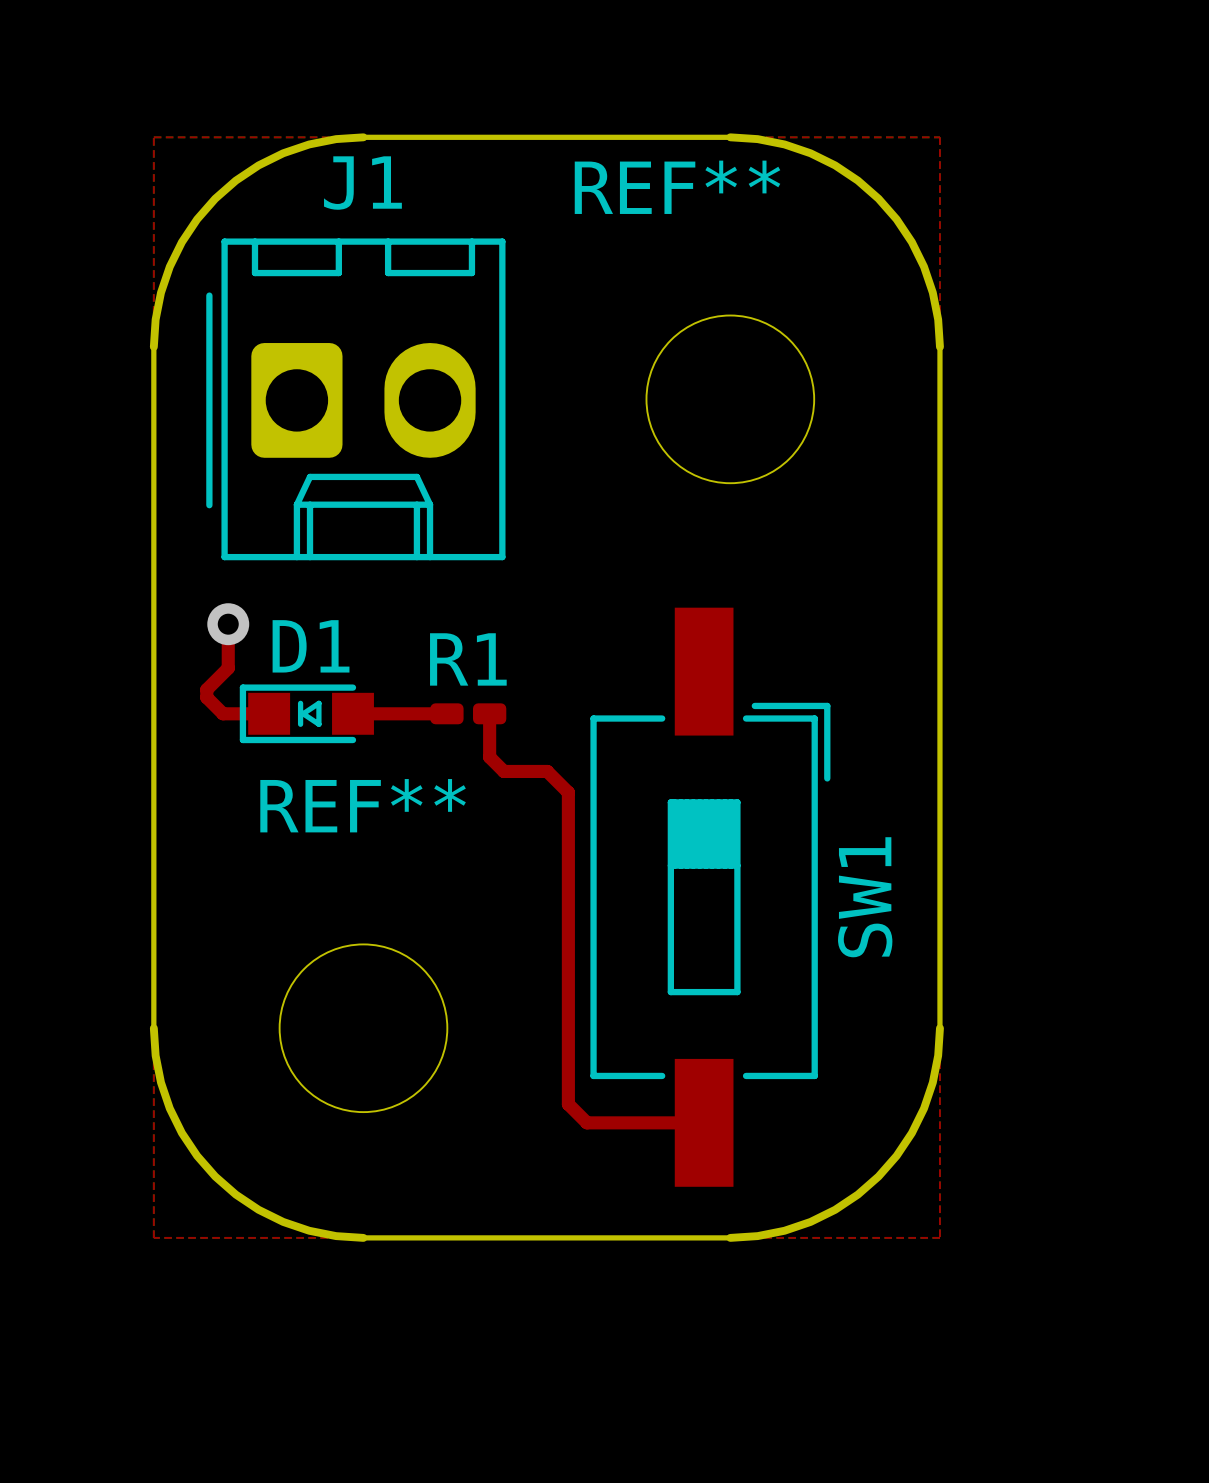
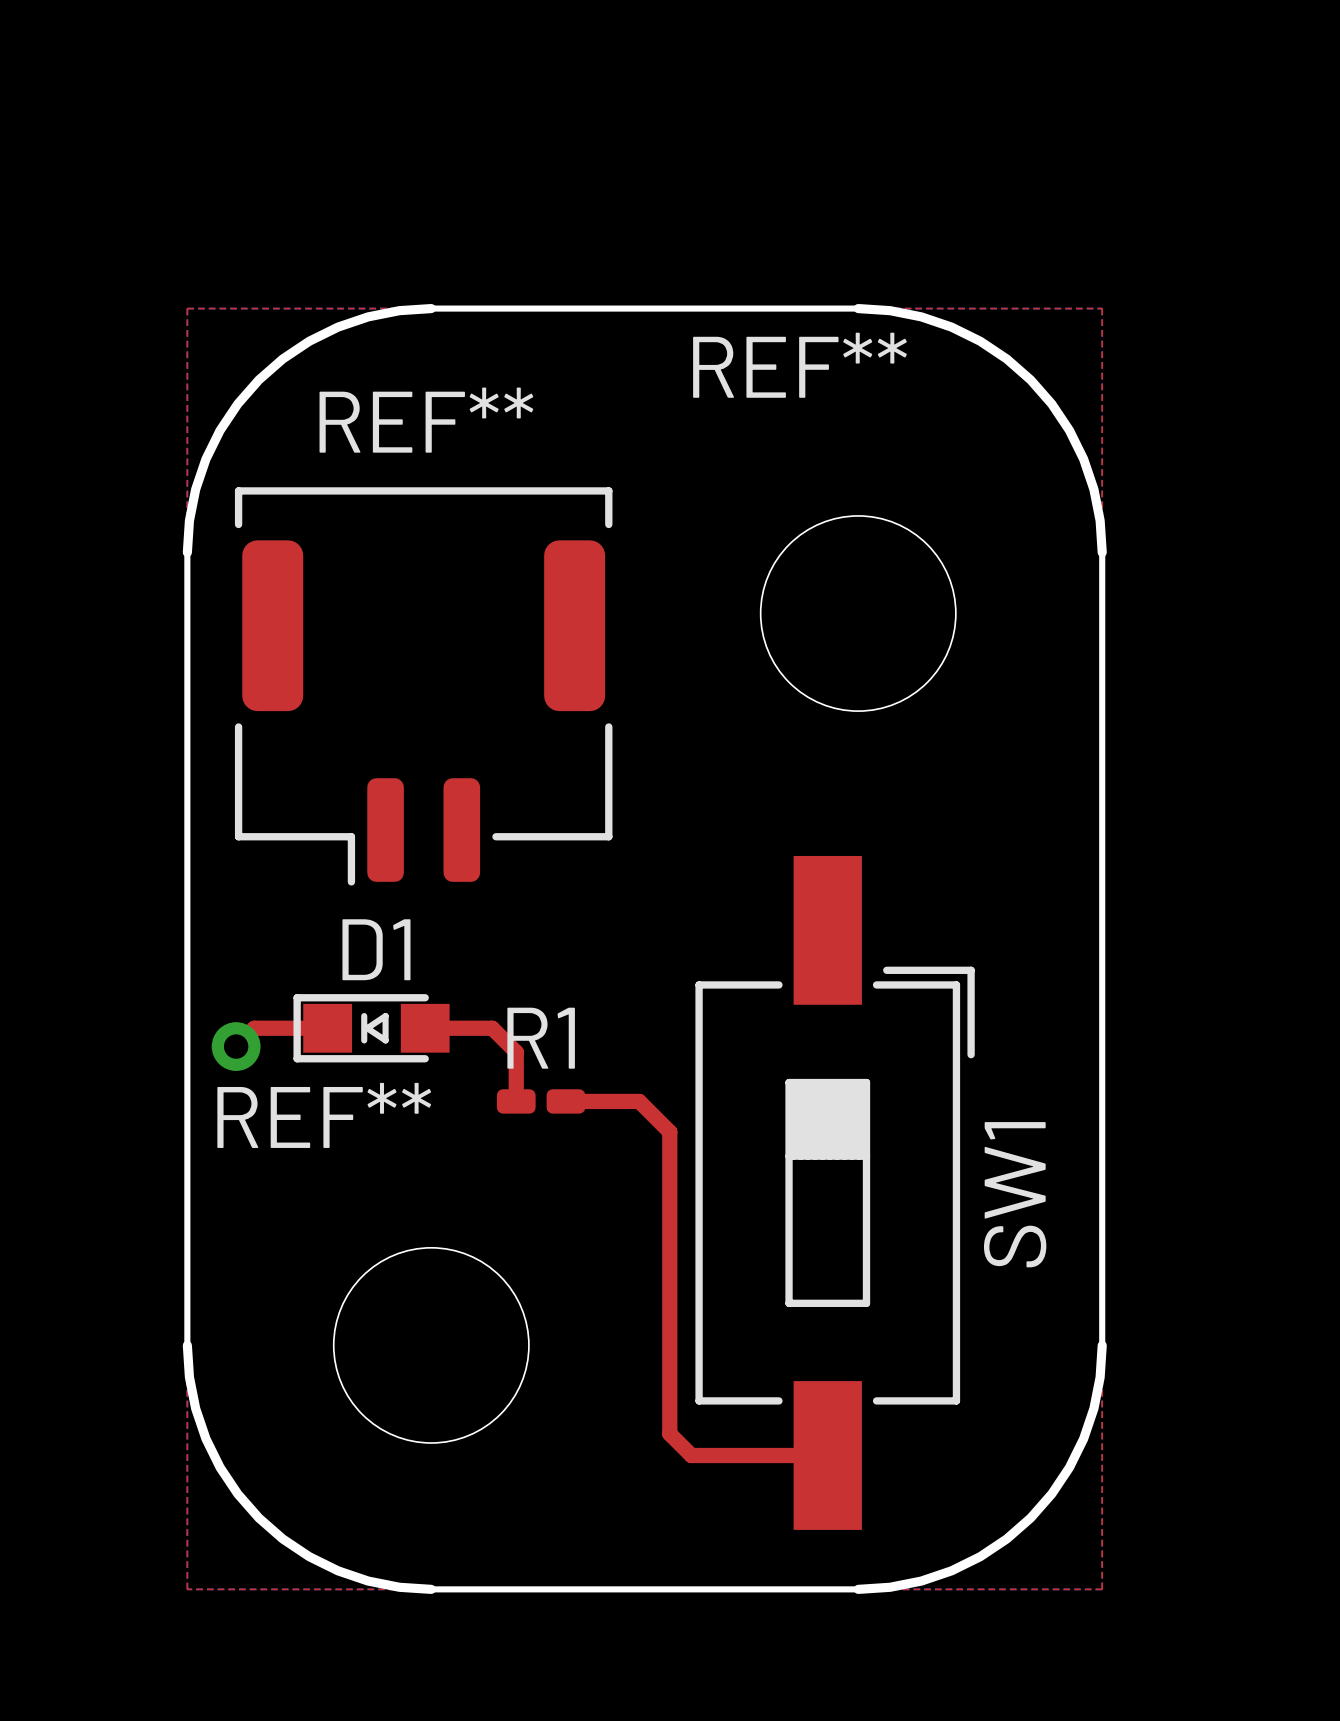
J1: (355, 399) -> none
REF**: none -> (423, 686)
top track: (228, 624) (228, 668) (206, 689) (206, 697) (223, 713) (269, 713) -> none
via position: (228, 624) -> (236, 1046)
D1 position: (306, 713) -> (371, 1028)
top track: (352, 713) (446, 713) -> none
R1 position: (468, 713) -> (541, 1101)
top track: (489, 713) (489, 757) (503, 771) (547, 771) (568, 792) (568, 844) -> (565, 1101) (639, 1101) (669, 1131)
top track: none -> (327, 1028) (254, 1028) (236, 1046)
top track: none -> (425, 1028) (492, 1028) (516, 1052) (516, 1101)
REF** name position: REF** (363, 805) -> REF** (324, 1115)

